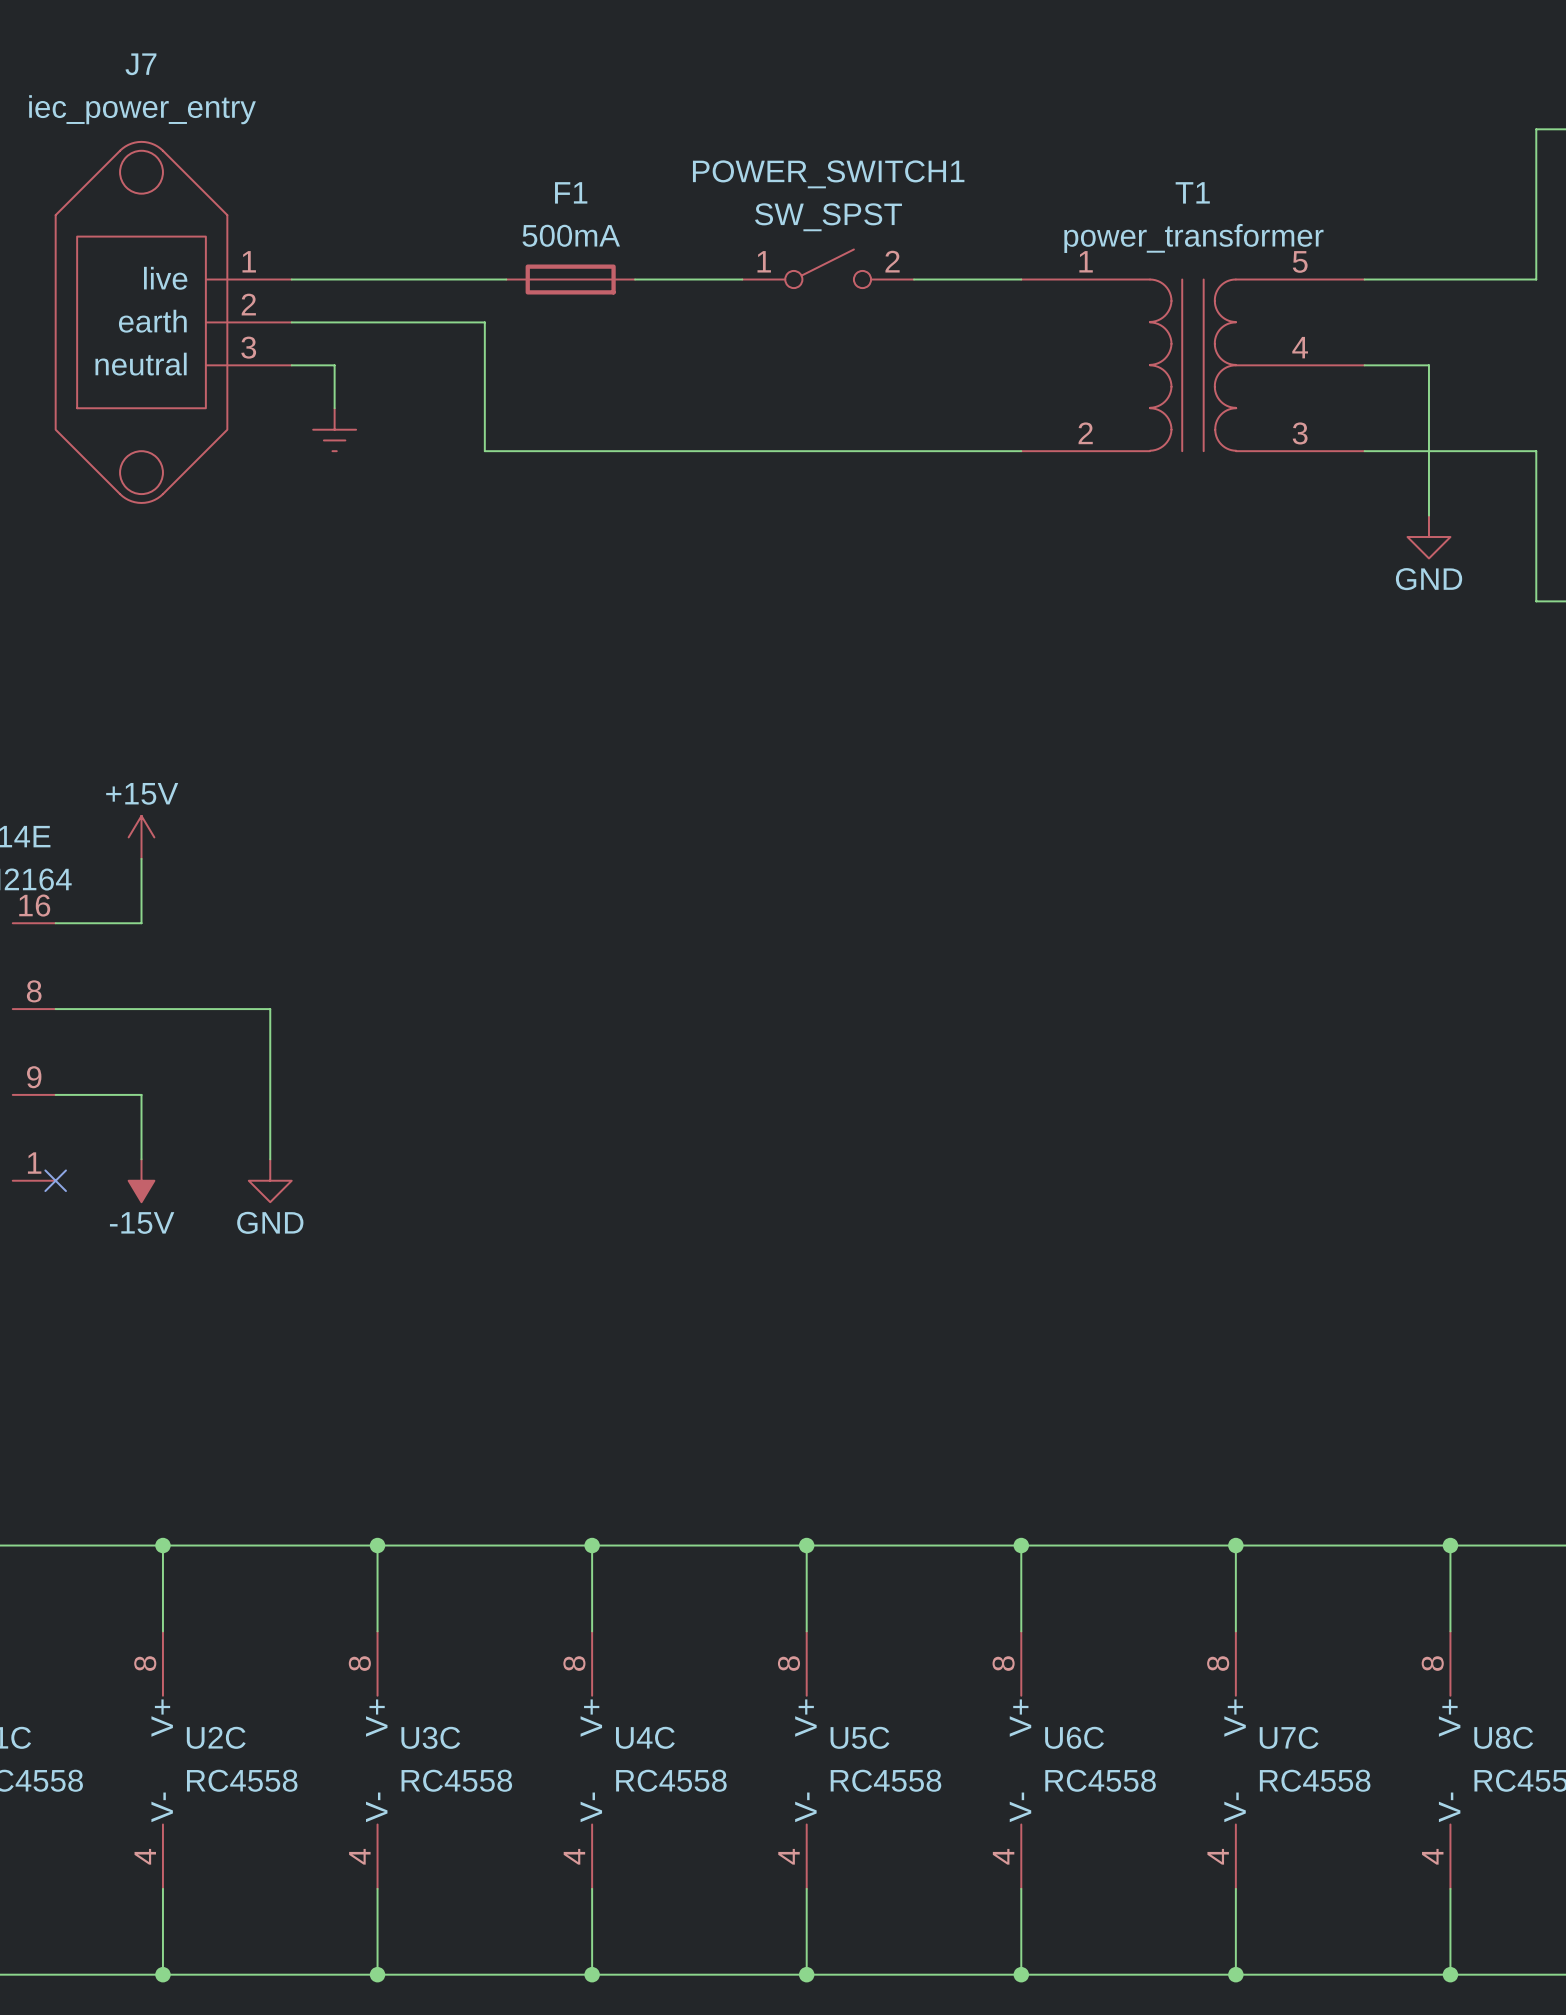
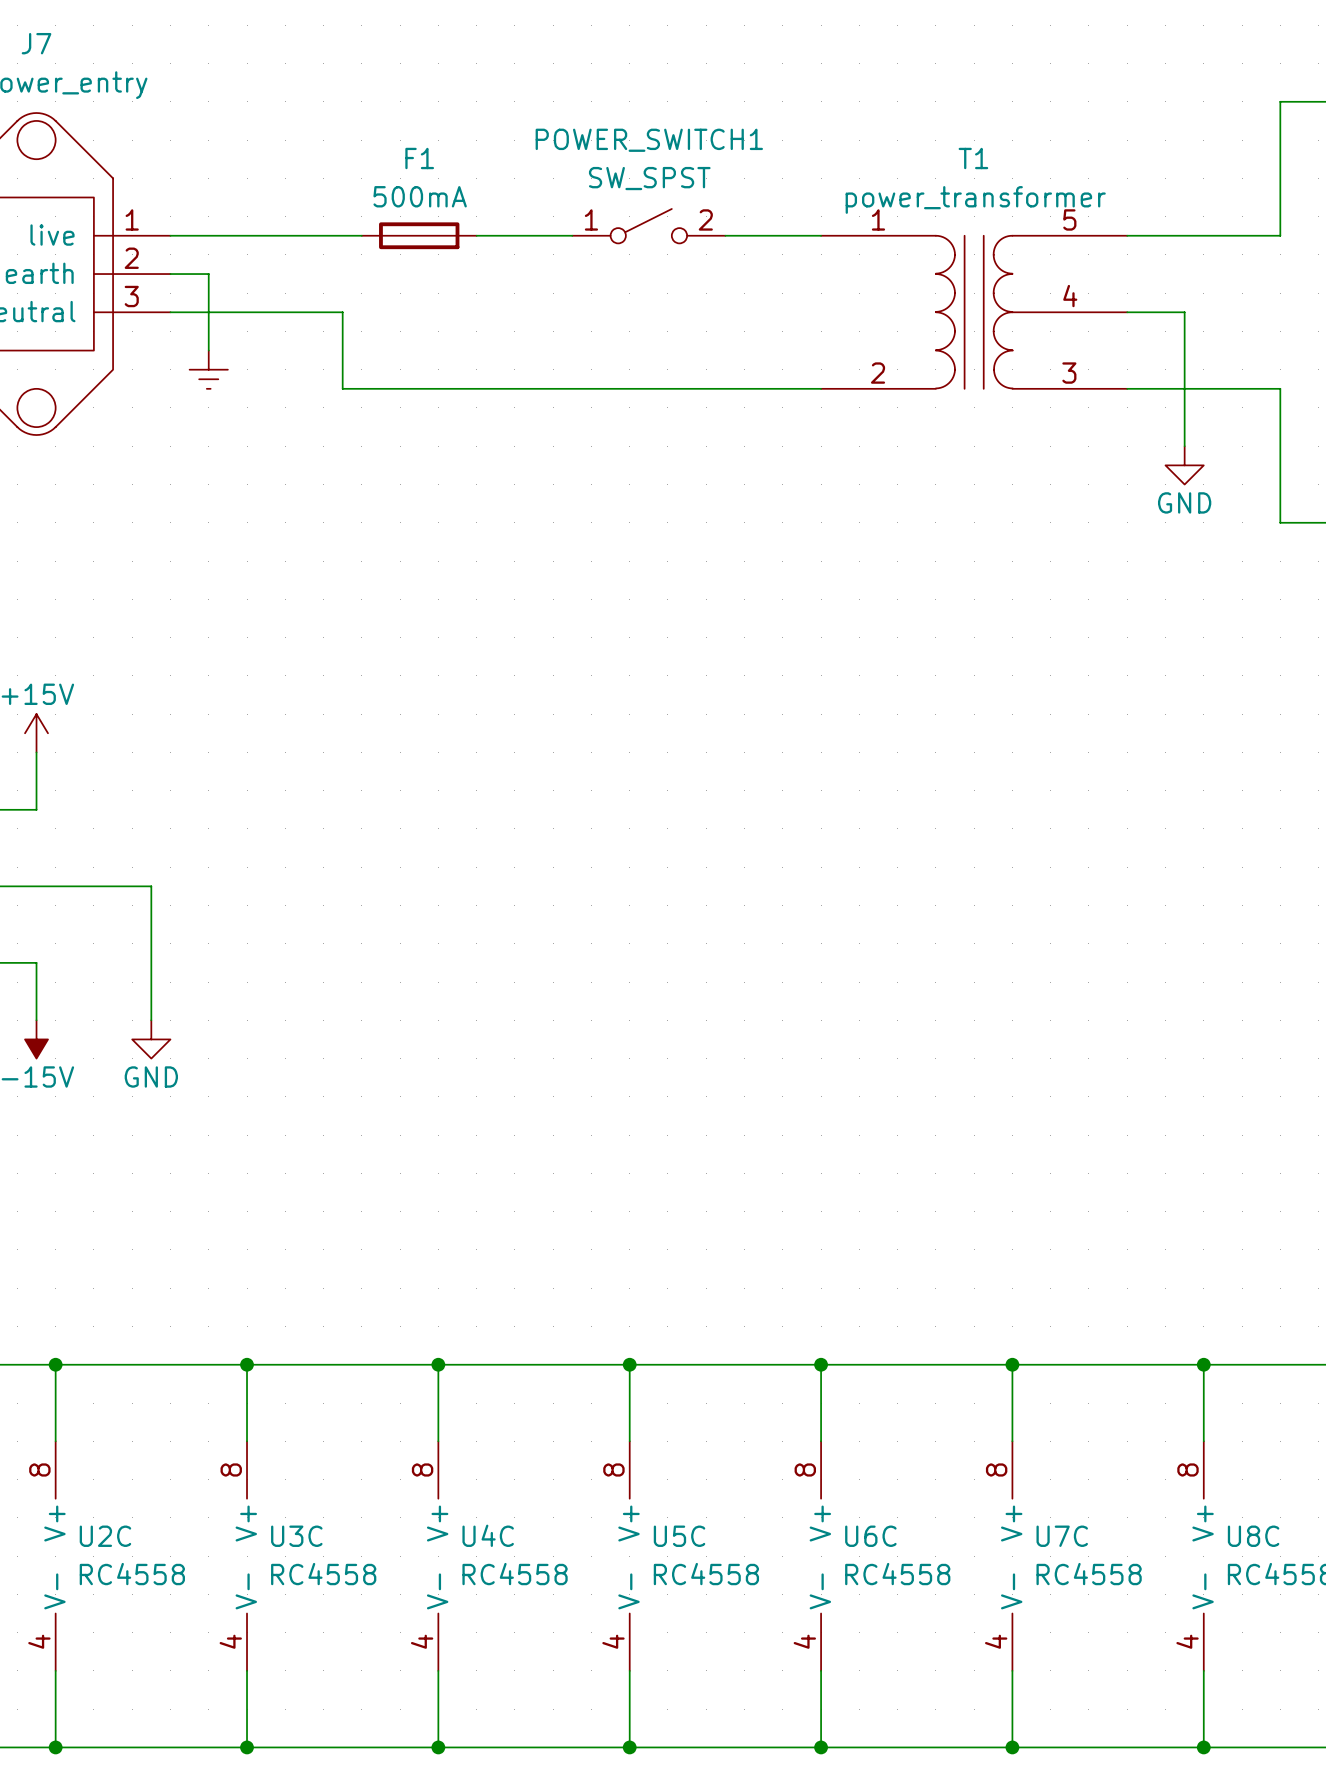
wire: (334, 322) (484, 322) (484, 365) -> (208, 274) (208, 312) (342, 312)

